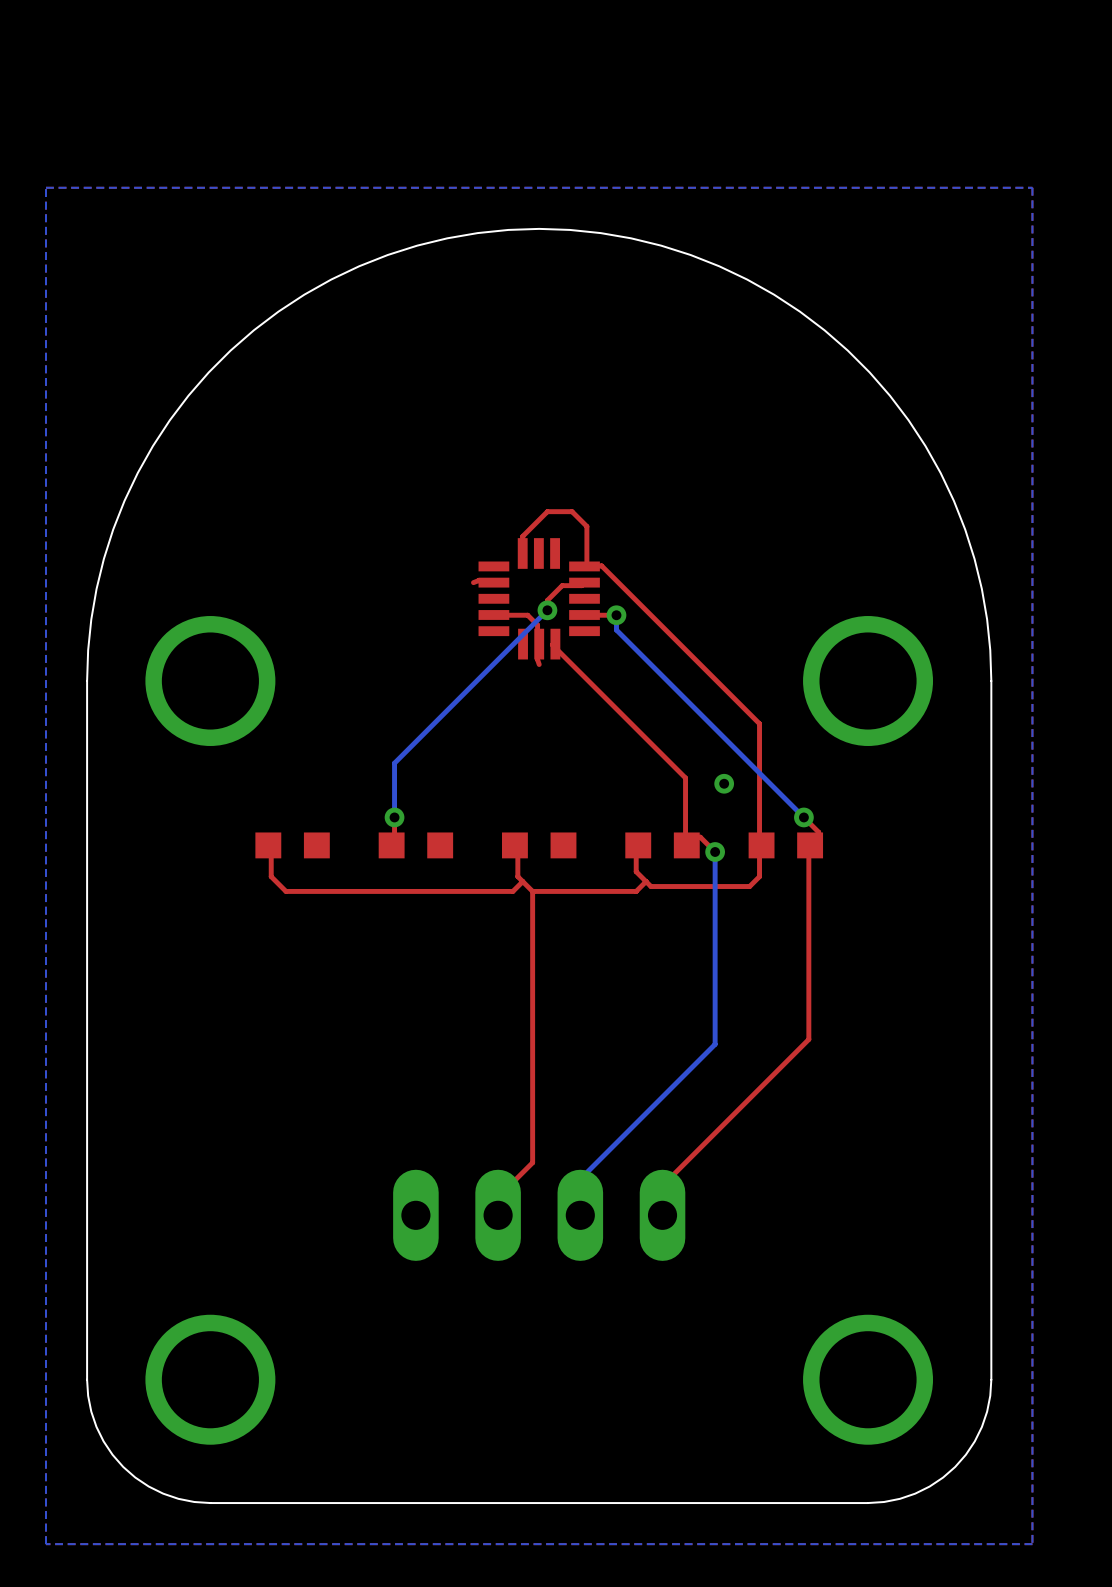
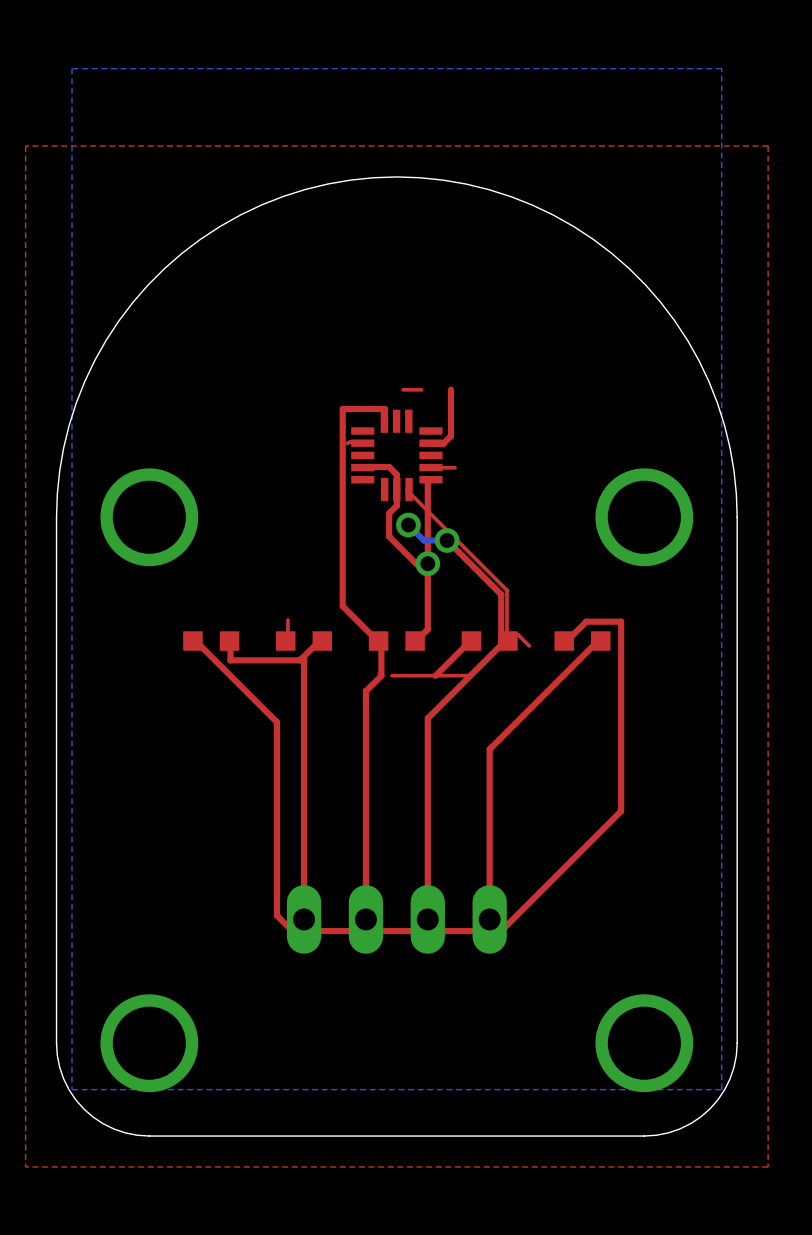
bottom zone outline: (1032, 187) (45, 187) (45, 1544) (1032, 1544) (1032, 187) -> (721, 68) (721, 1089) (72, 1089) (72, 68) (721, 68)
top track: (547, 511) (522, 536) (522, 553) -> none
top track: (572, 511) (586, 526) (586, 565) (601, 565) (759, 723) (759, 842) (761, 845) (759, 847) (759, 876) (749, 886) (651, 886) (636, 871) (636, 847) (638, 845) -> (435, 675) (471, 641)
top track: (584, 582) (581, 585) (562, 585) (547, 600) (547, 610) -> (430, 443) (443, 443) (450, 436) (450, 389)
bottom track: (547, 610) (394, 763) (394, 817) -> none
via: (547, 610) -> none
top track: (493, 614) (527, 615) (537, 625) (539, 664) -> (362, 467) (389, 466) (396, 474) (396, 505) (389, 513) (389, 536) (427, 575)
bottom track: (616, 615) (616, 630) (803, 817) -> none
via: (616, 615) -> none
top track: none -> (430, 479) (427, 482) (427, 629) (415, 641)
bottom track: none -> (408, 525) (423, 540) (447, 540)
via: none -> (408, 525)
top track: none -> (447, 540) (501, 594) (501, 641) (507, 641)
via: none -> (447, 540)
via: none -> (427, 563)
via: (724, 783) -> none
via: (394, 817) -> none
top track: (803, 817) (818, 832) (818, 837) (808, 847) (808, 1039) (665, 1182) (665, 1212) (662, 1215) -> none
via: (803, 817) -> none
top track: (268, 845) (271, 847) (271, 876) (286, 891) (512, 891) (522, 881) -> (192, 641) (195, 641) (276, 722) (276, 915) (292, 931) (501, 931) (621, 811) (621, 621) (586, 621) (567, 641) (564, 641)
top track: none -> (322, 641) (319, 641) (300, 660) (230, 660) (229, 641)
top track: (514, 845) (517, 847) (517, 876) (532, 891) (532, 1162) (498, 1197) -> (385, 408) (342, 408) (342, 606) (377, 641) (381, 641) (381, 675) (365, 691) (365, 905)
top track: none -> (505, 641) (427, 718) (427, 888)
top track: none -> (600, 641) (597, 641) (489, 749) (489, 888)
bottom track: (715, 851) (715, 1044) (581, 1177) (580, 1215) -> none
via: (715, 851) -> none
top track: none -> (302, 658) (304, 660) (304, 888)

